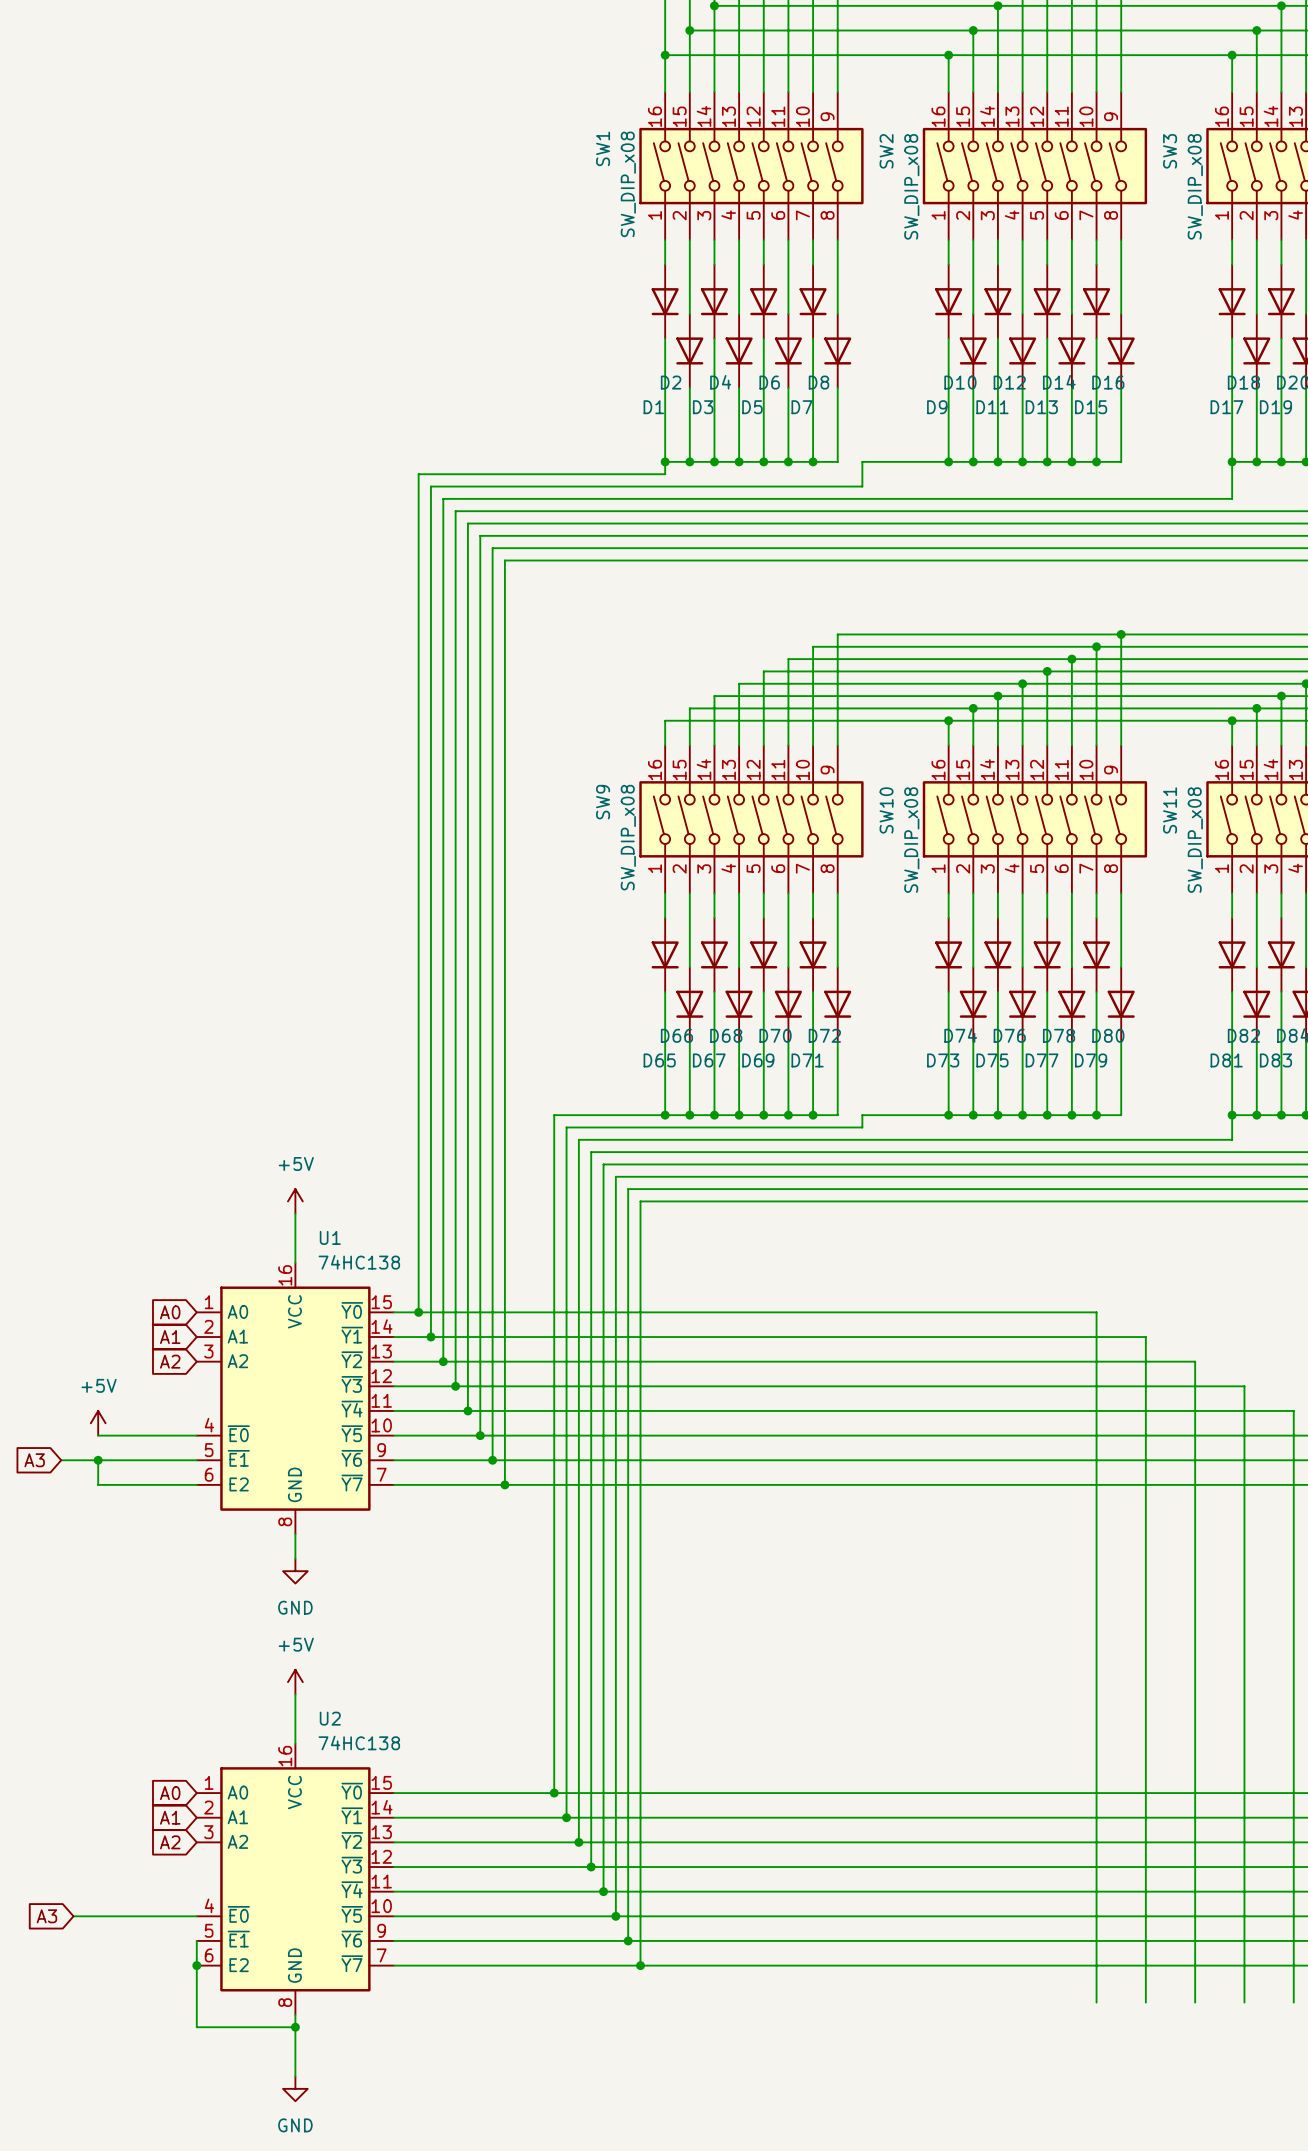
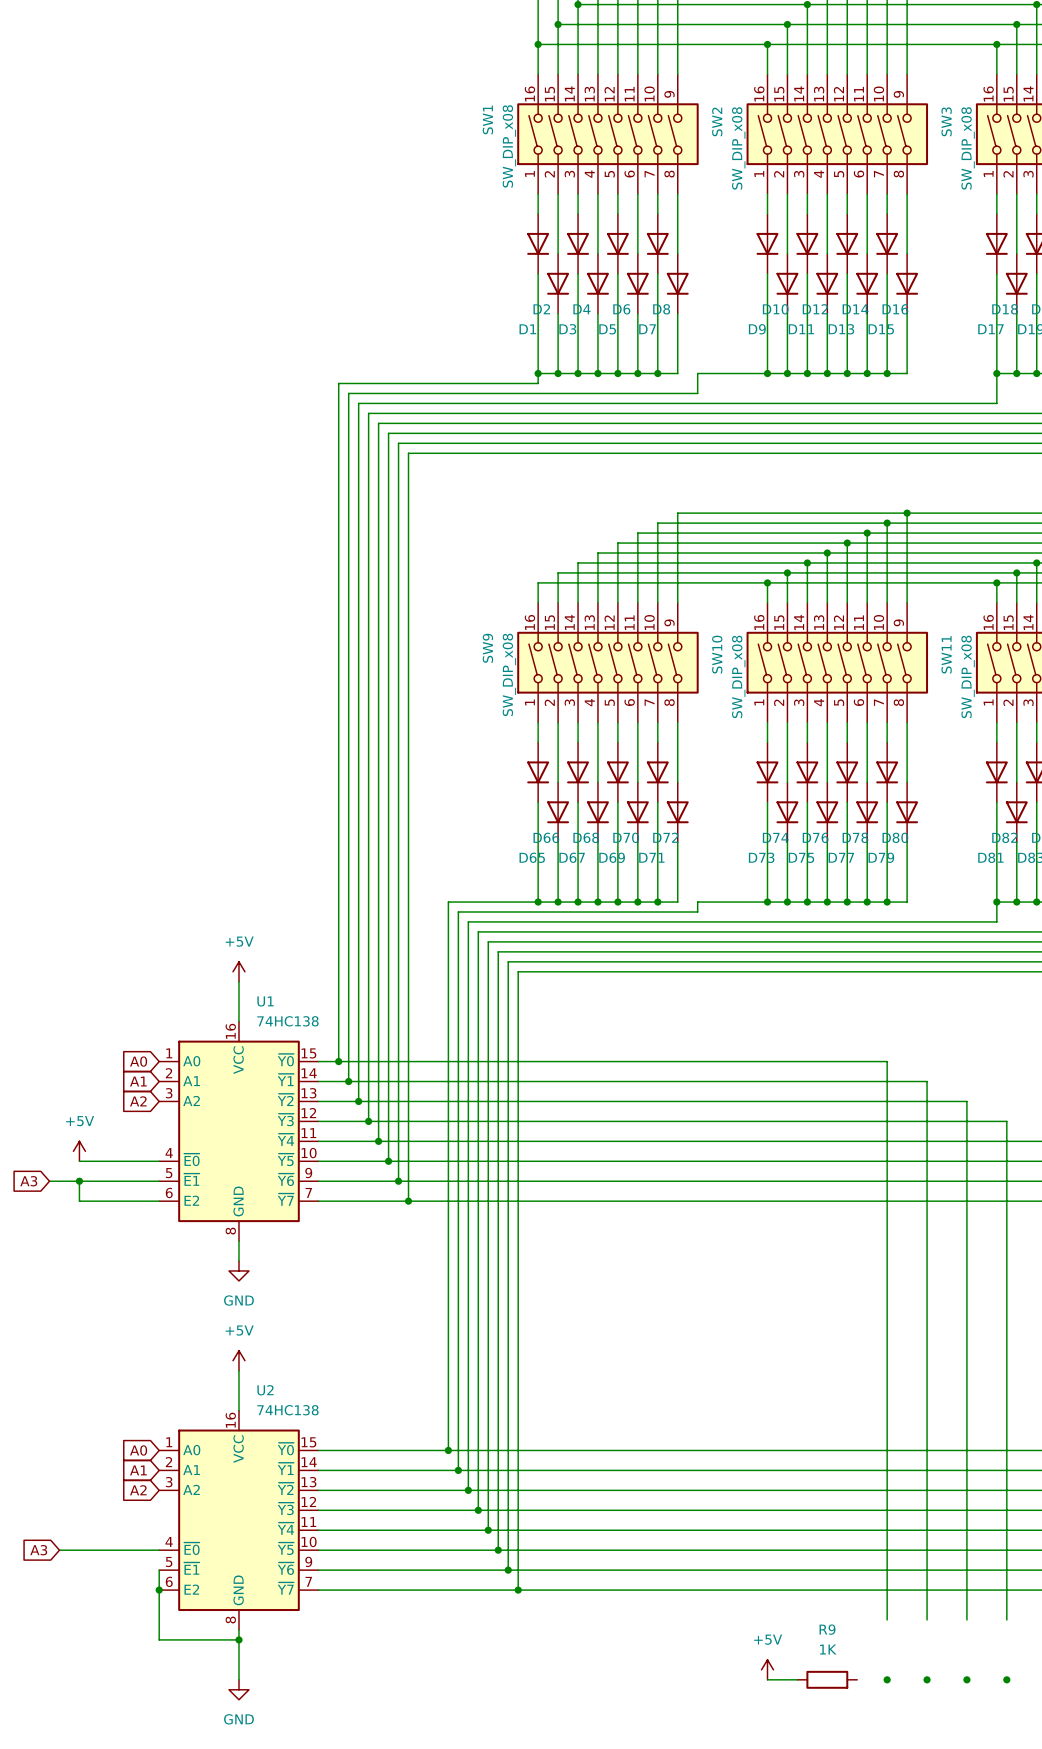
power symbol: none -> +5V (767, 1669)
wire: none -> (767, 1679) (797, 1679)
R9: none -> 1K (827, 1679)
junction: none -> (887, 1679)
junction: none -> (927, 1679)
junction: none -> (966, 1679)
junction: none -> (1006, 1679)

